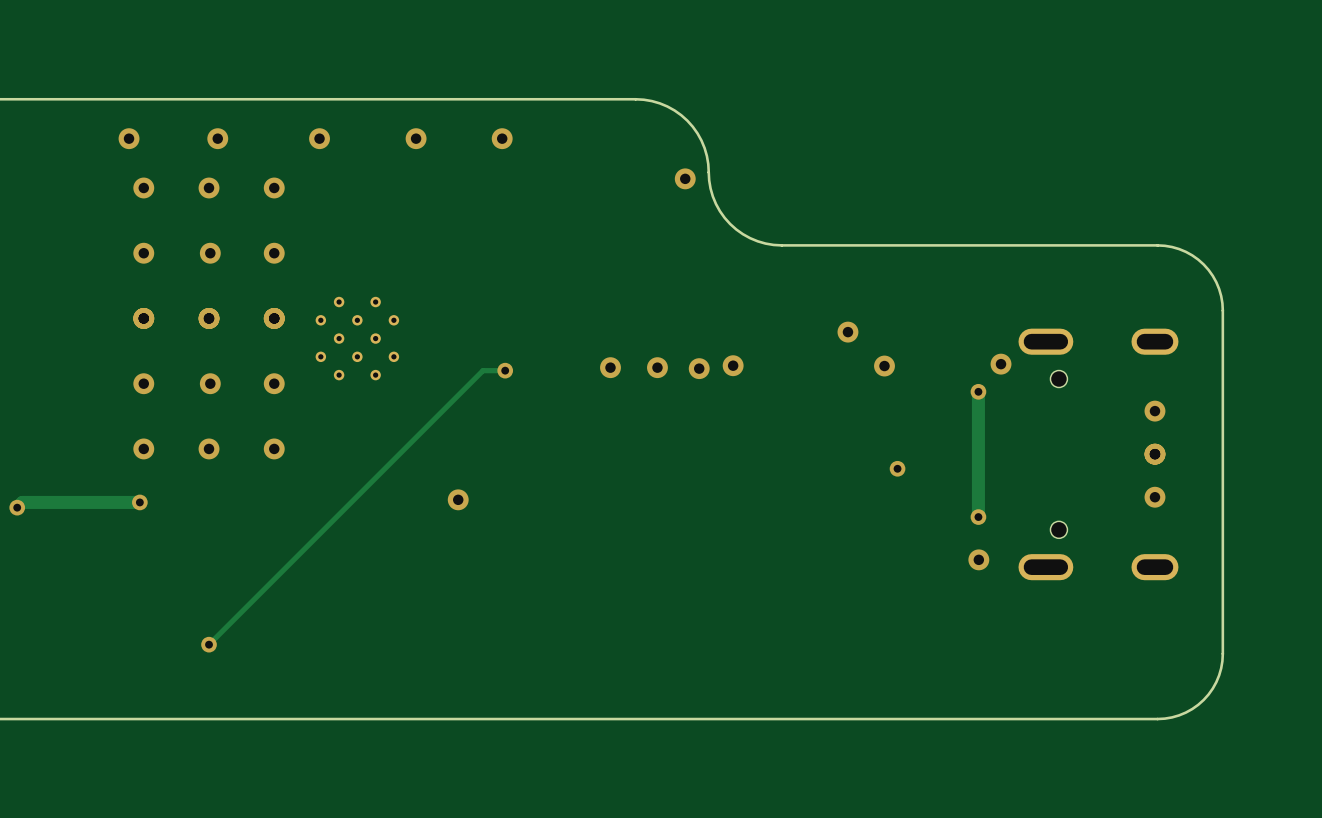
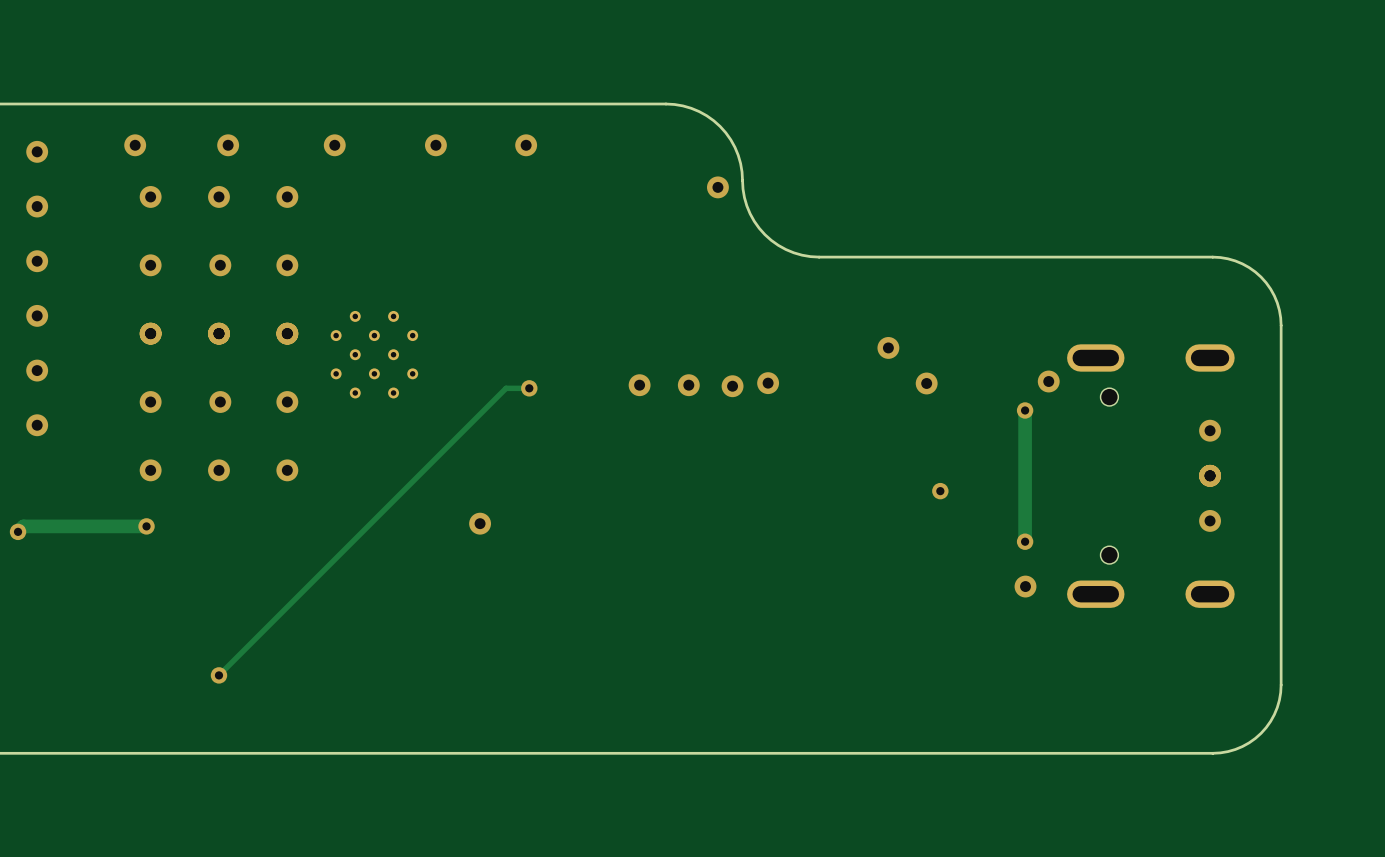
via: none -> (37, 151)
via: none -> (37, 206)
via: none -> (37, 261)
via: none -> (37, 315)
via: none -> (37, 370)
via: none -> (37, 425)

